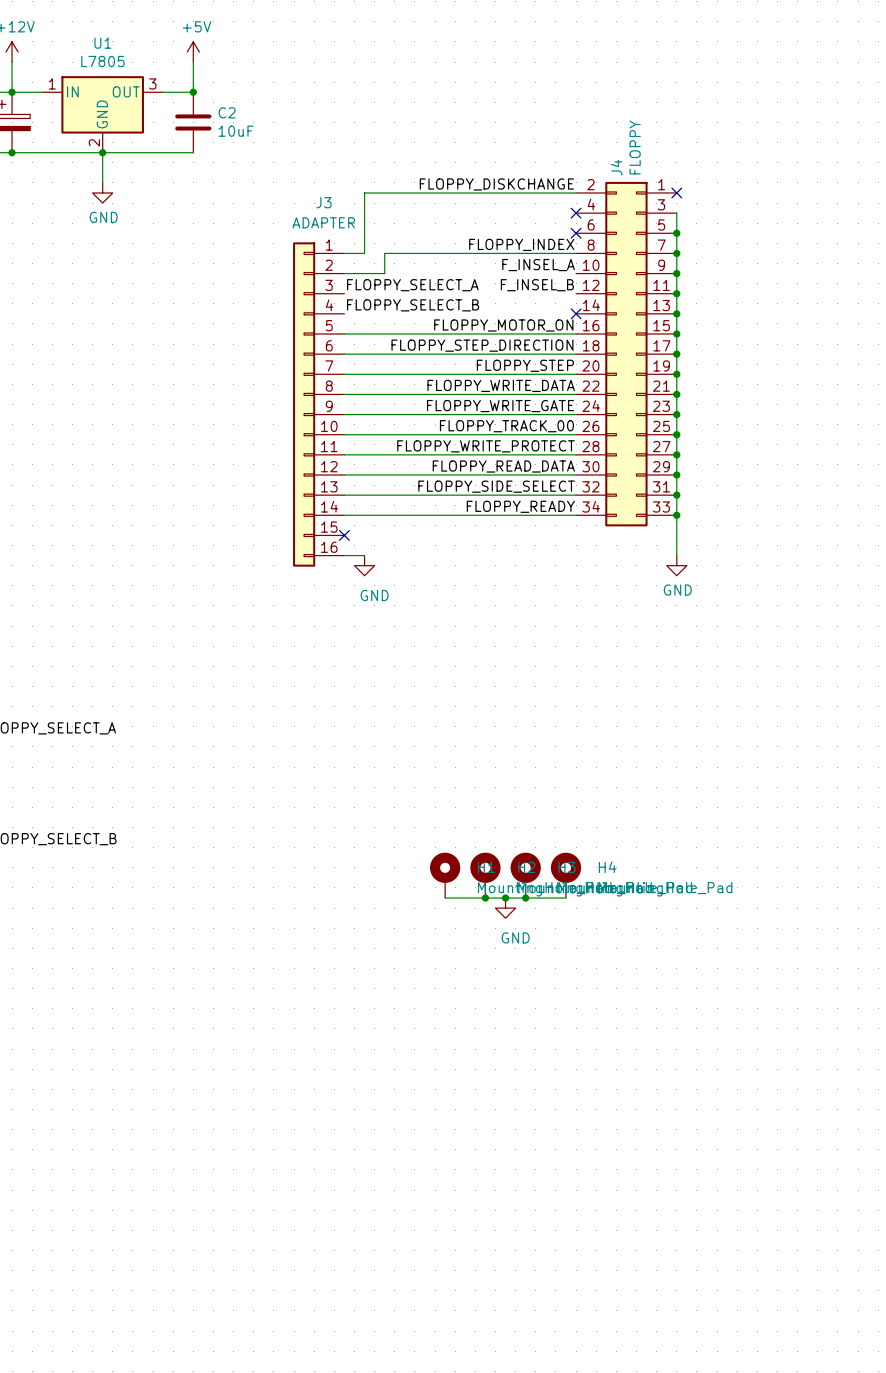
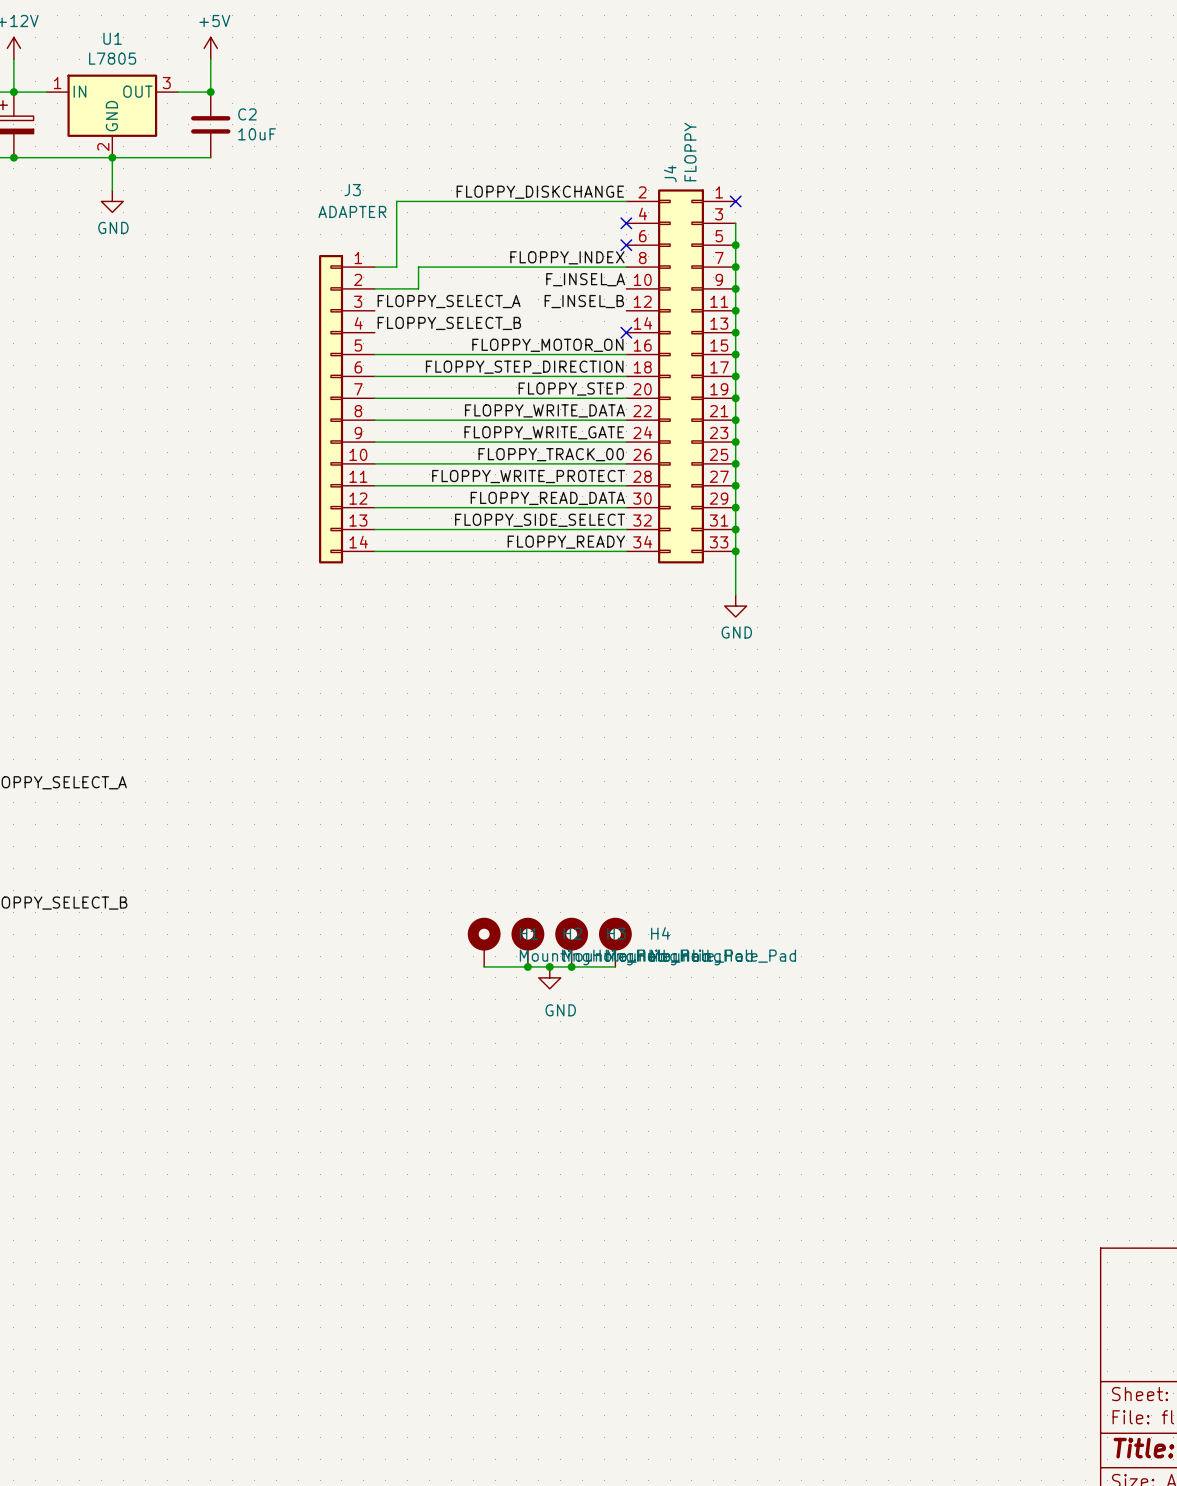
J3 symbol: [293, 242, 345, 567] -> [319, 255, 375, 564]
no-connect mark: (344, 535) -> none
wire: (344, 555) (364, 555) -> none
power symbol: GND (364, 565) -> none

